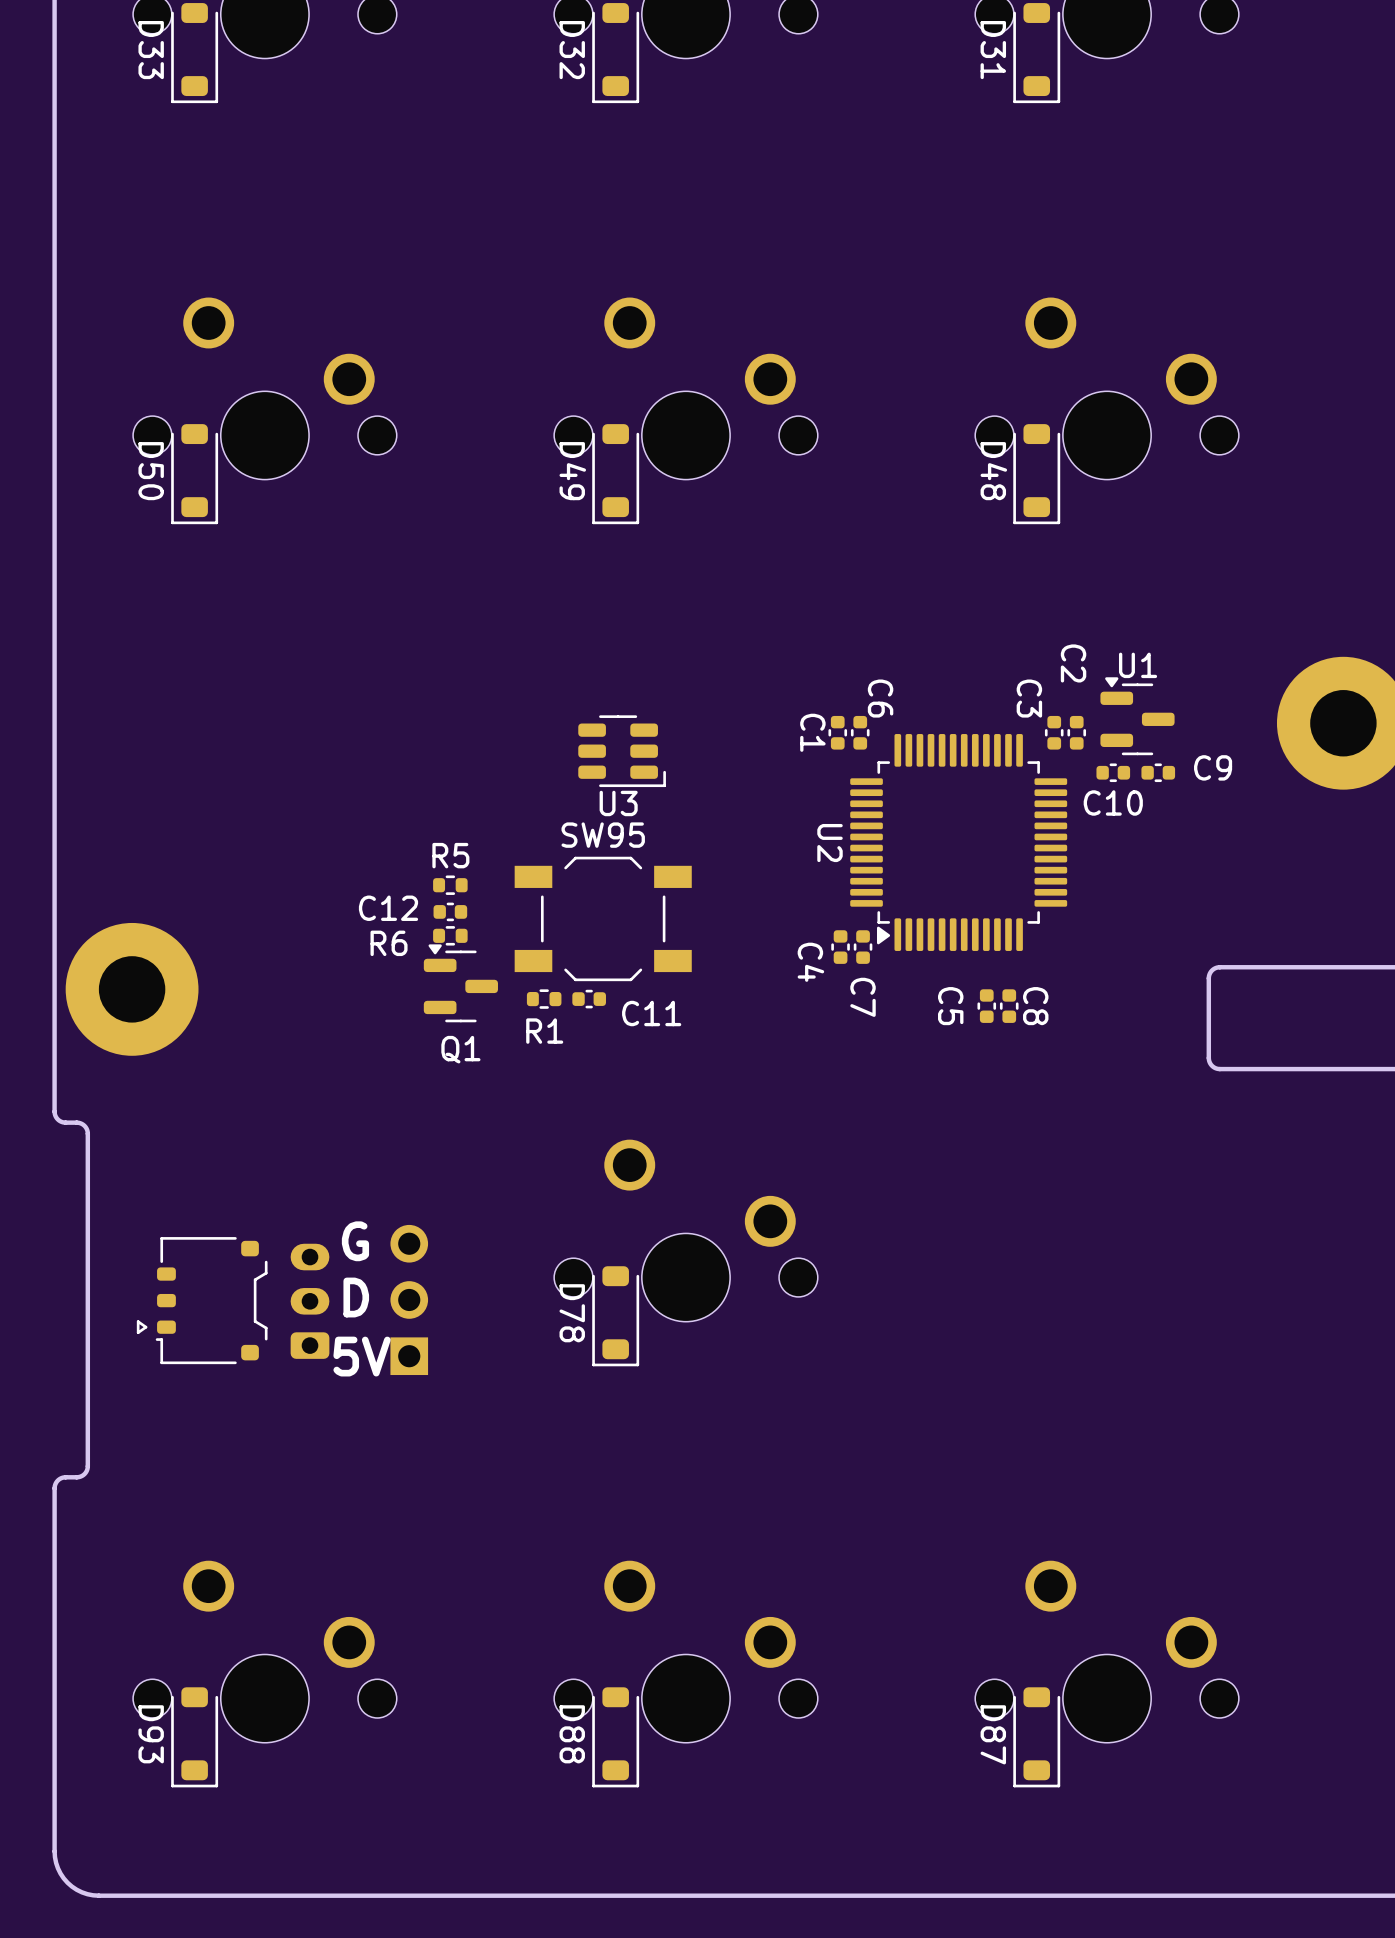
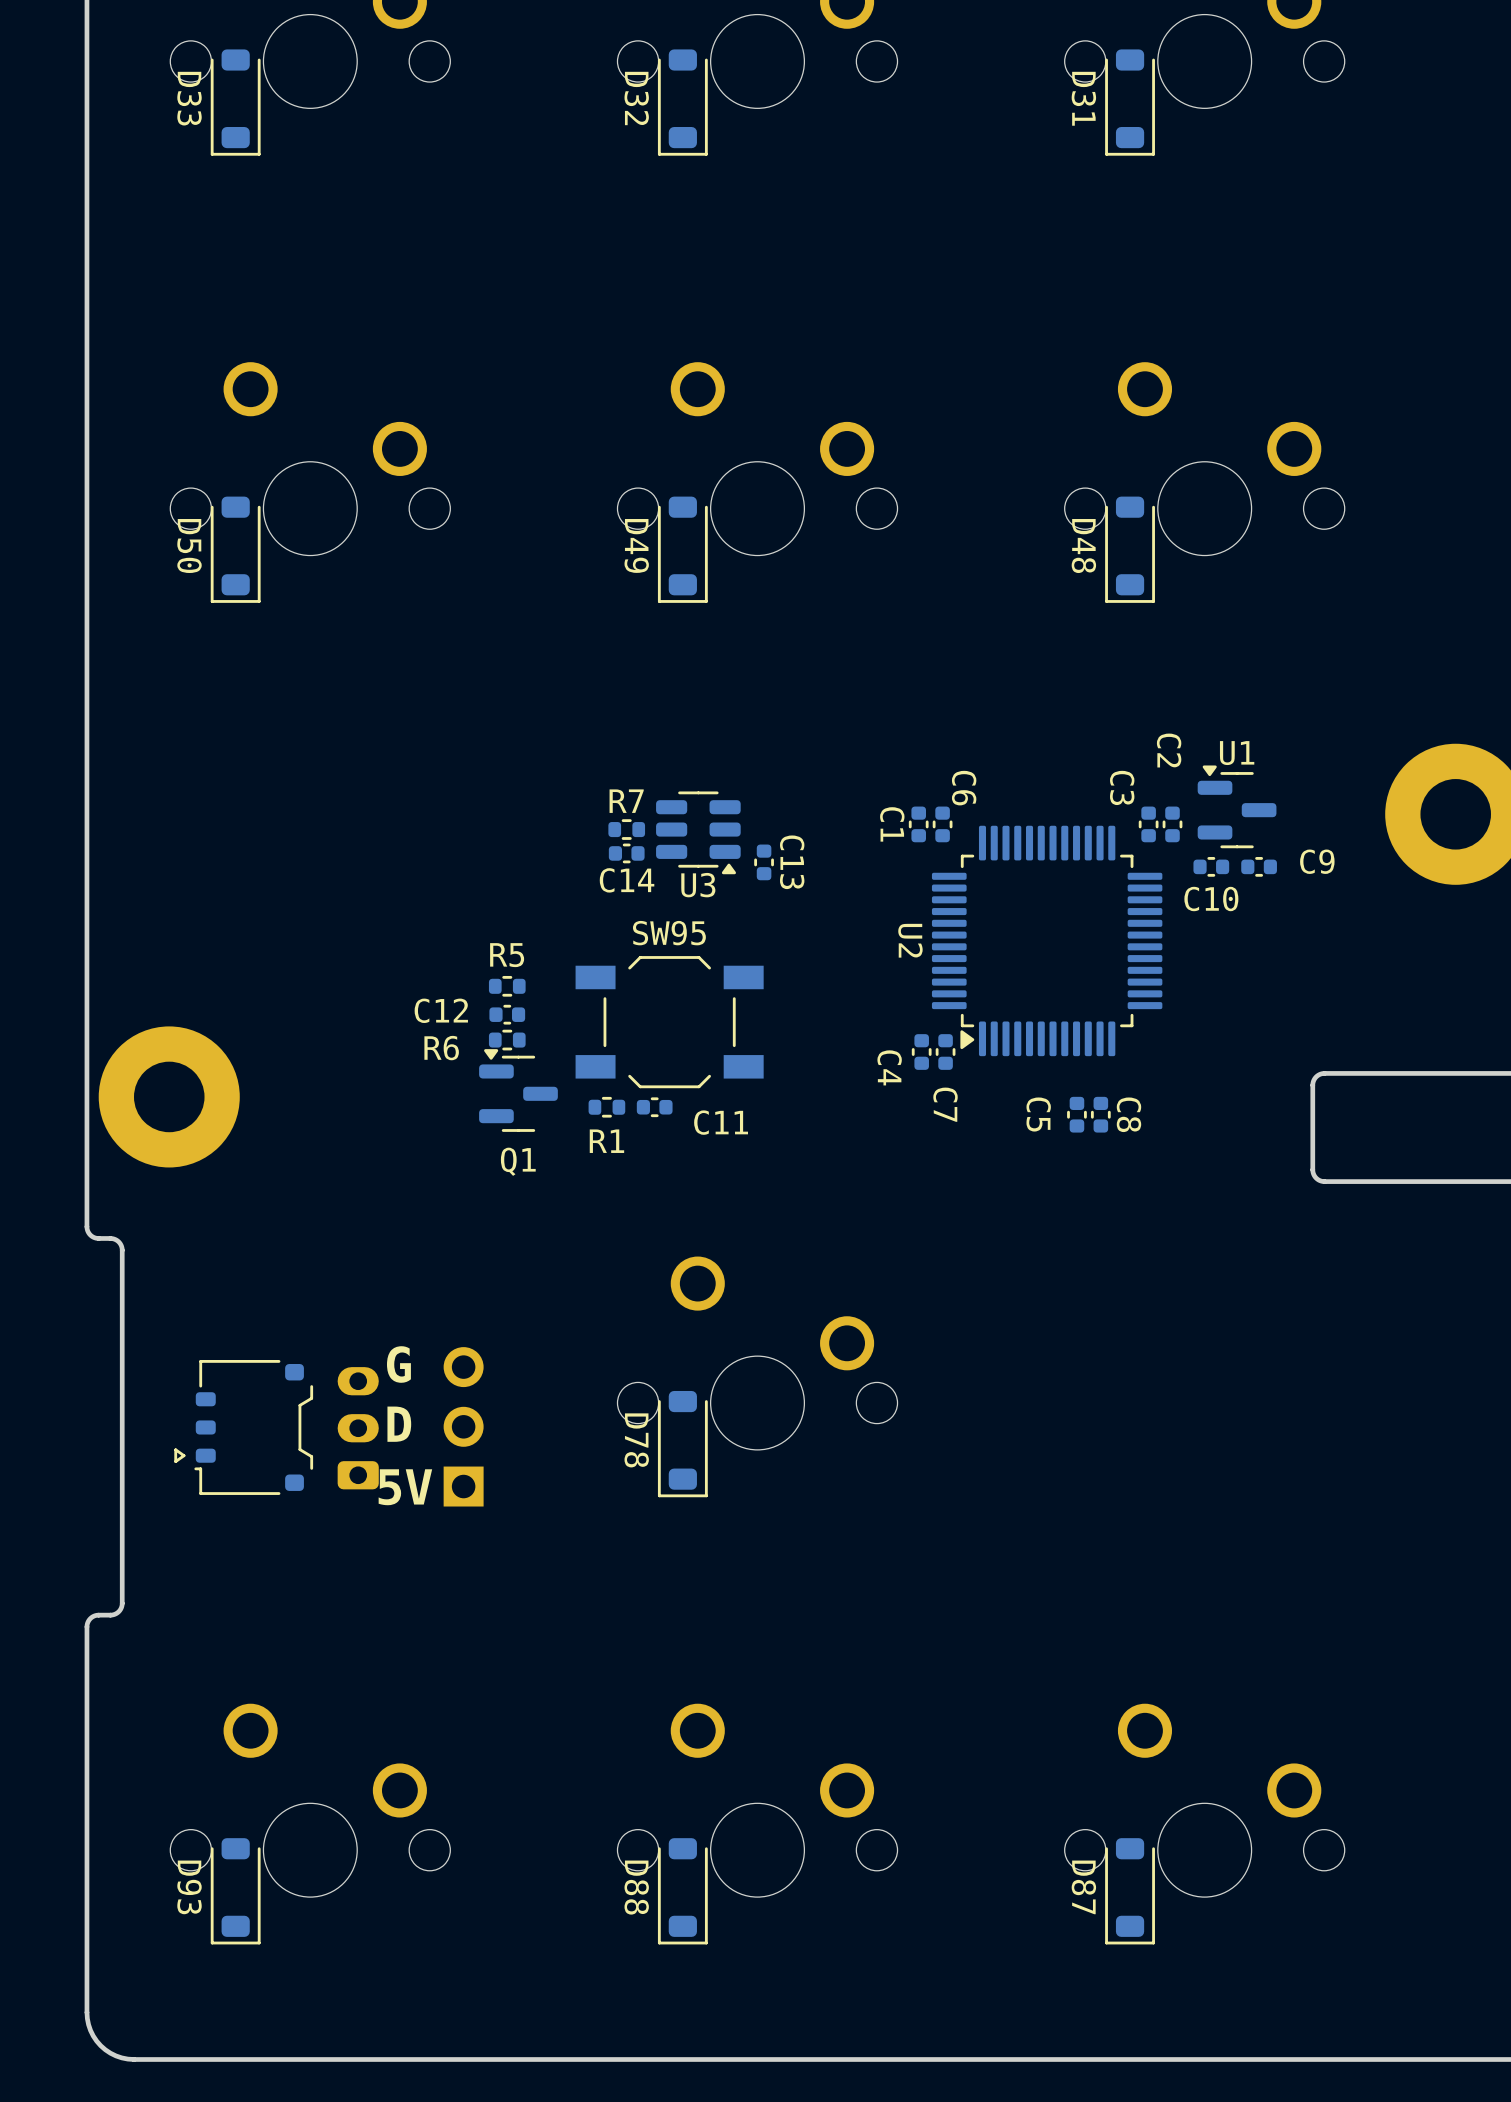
U3 footprint: [578, 715, 666, 788] -> [656, 791, 741, 875]
R7: none -> (626, 829)
C14: none -> (626, 853)
C13: none -> (764, 862)
U3 name position: U3 (618, 803) -> U3 (698, 885)

